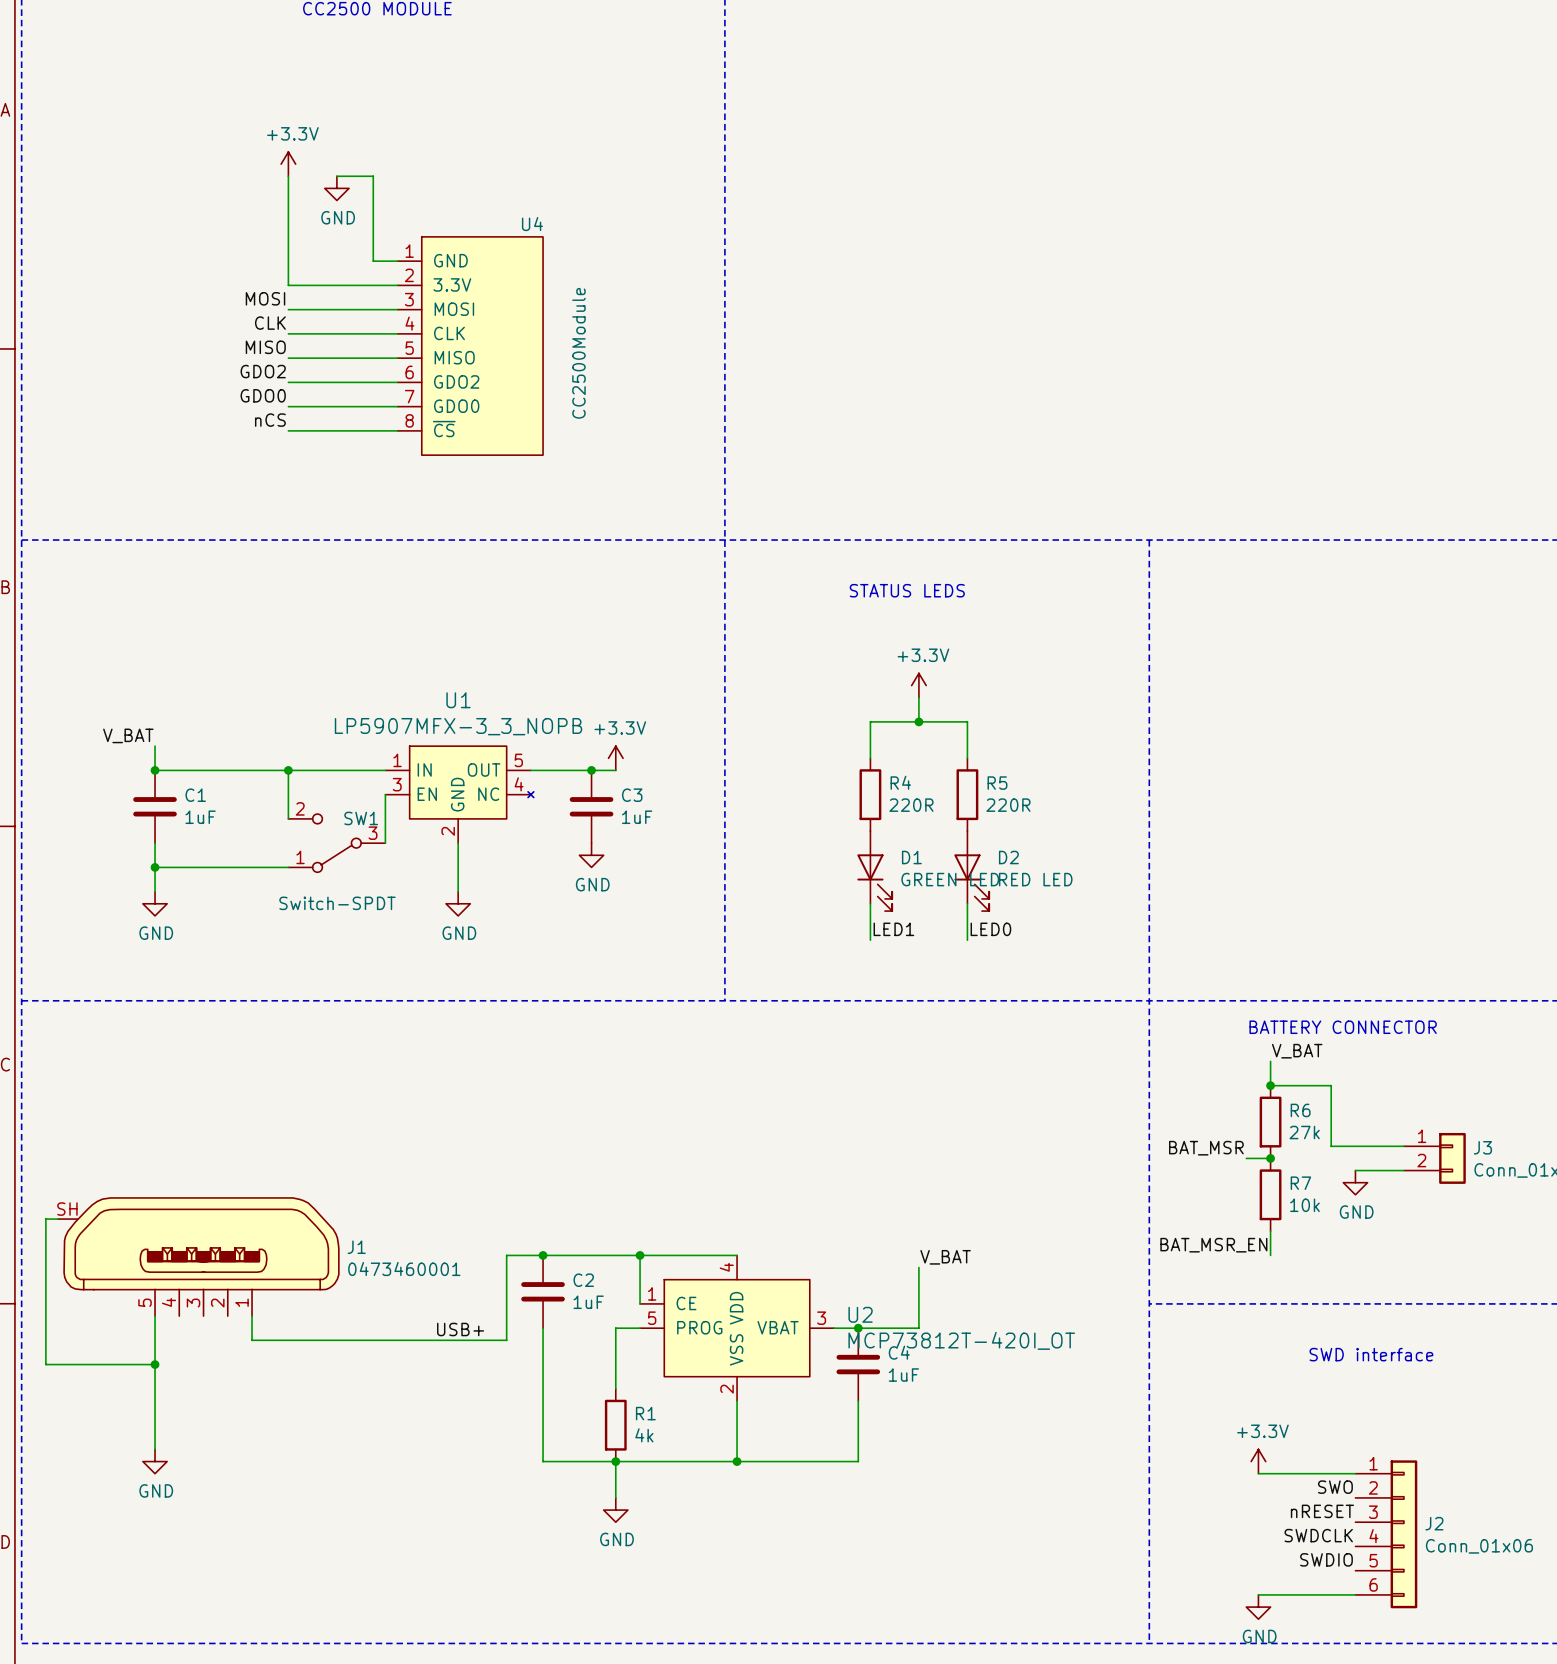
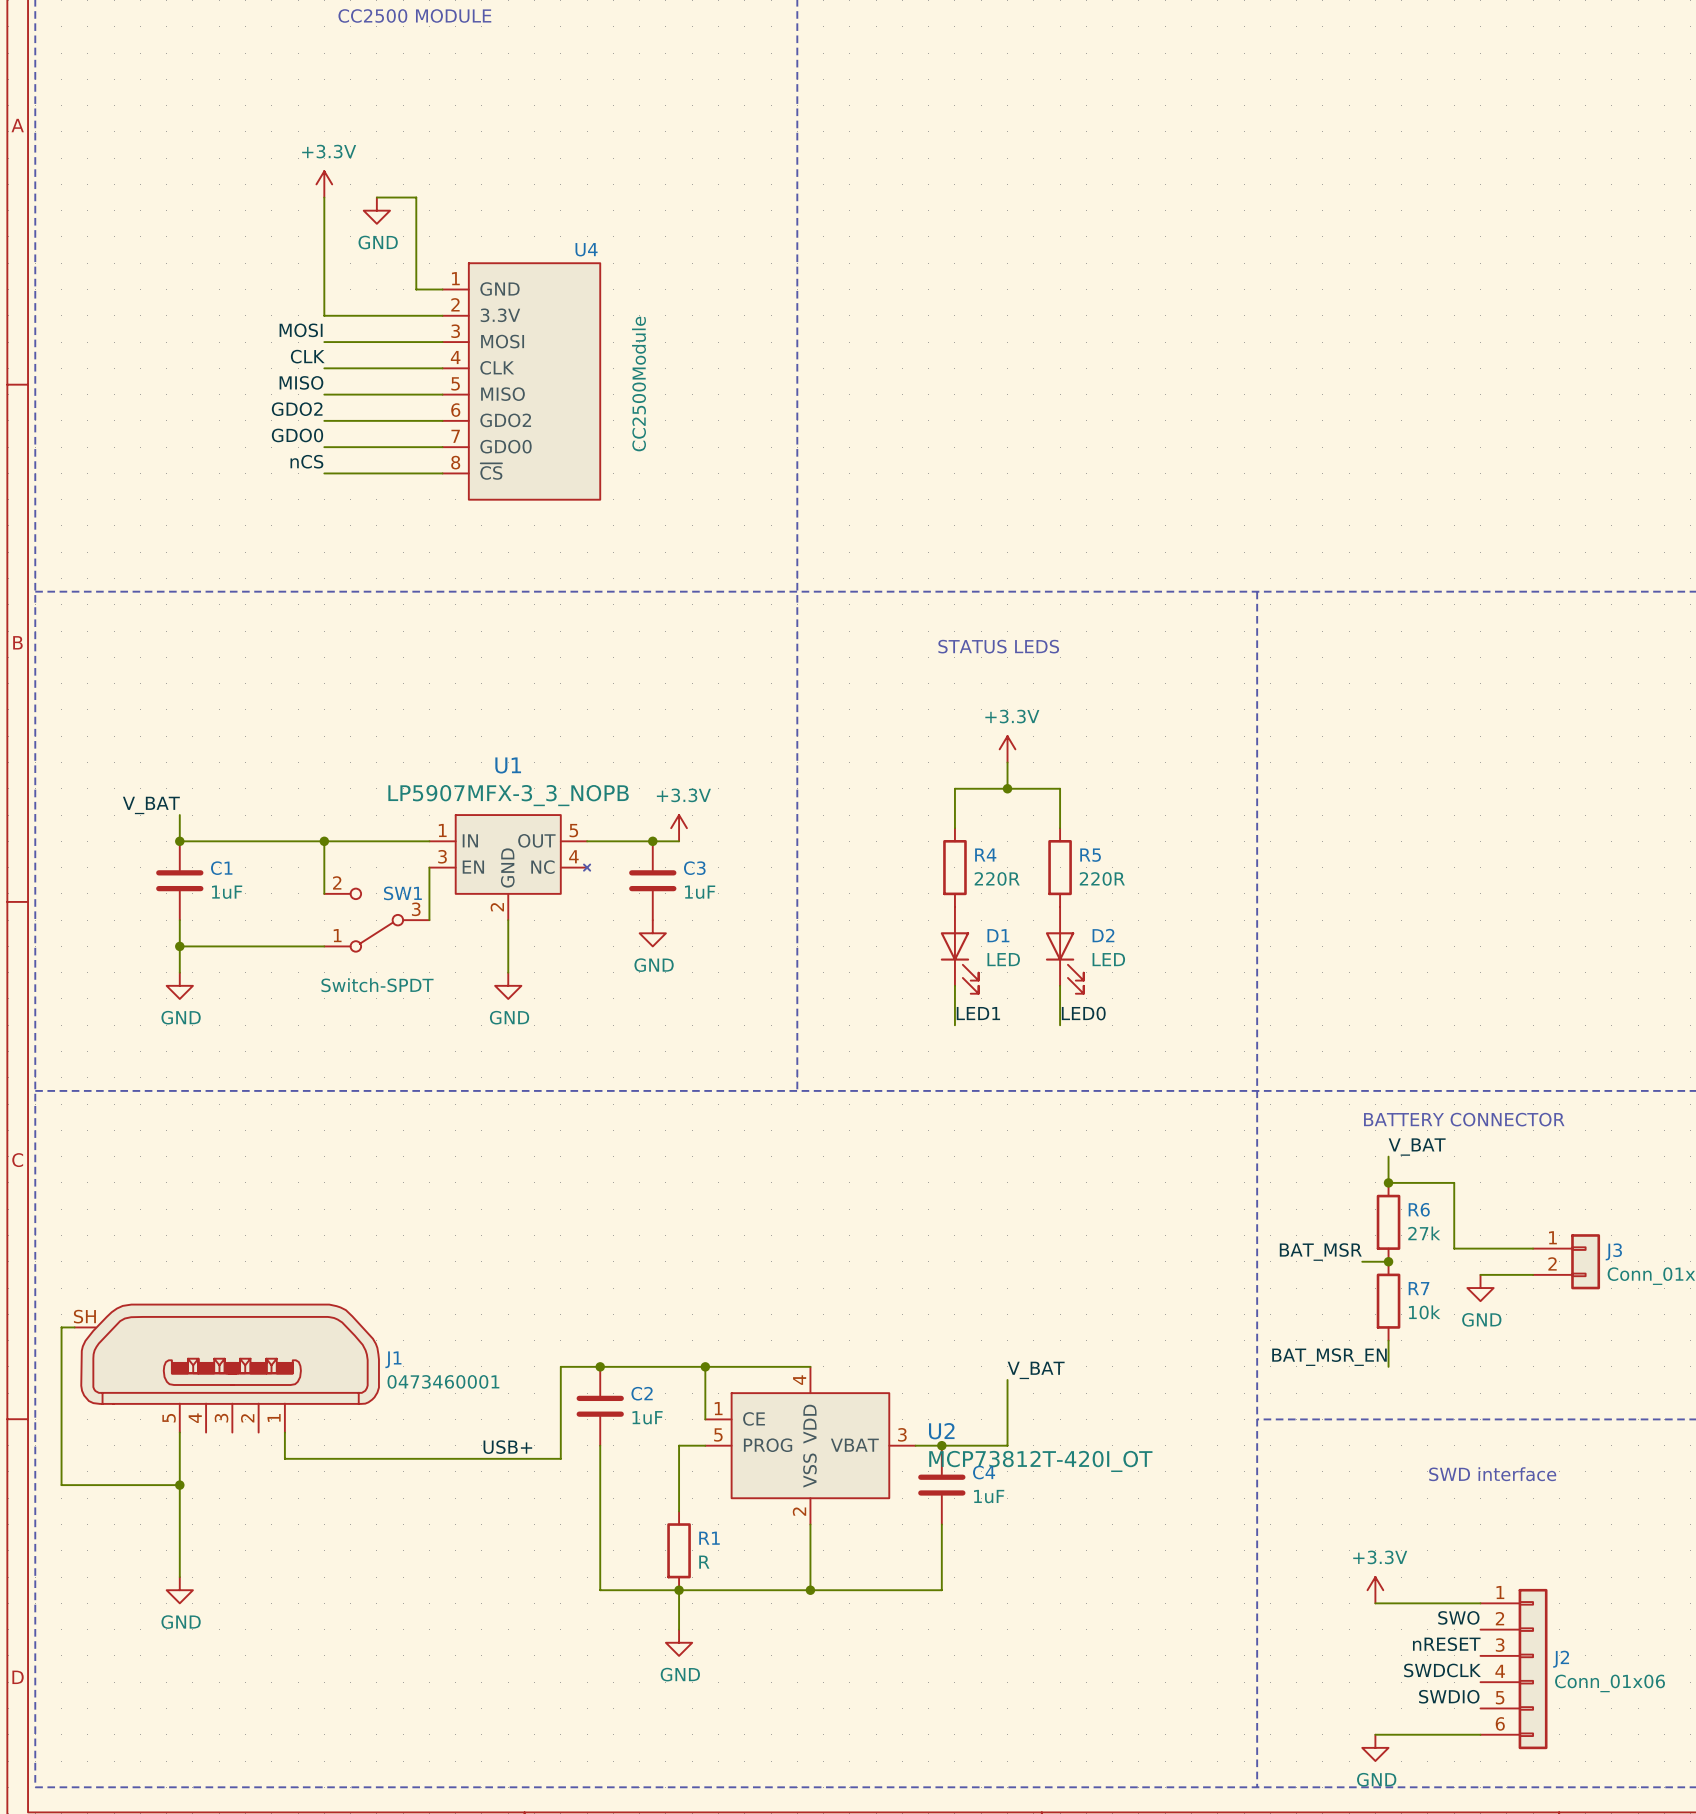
D1 value: GREEN LED (950, 879) -> LED (1003, 959)
D2 value: RED LED (1035, 879) -> LED (1108, 959)
R1 value: 4k (644, 1435) -> R (704, 1562)

